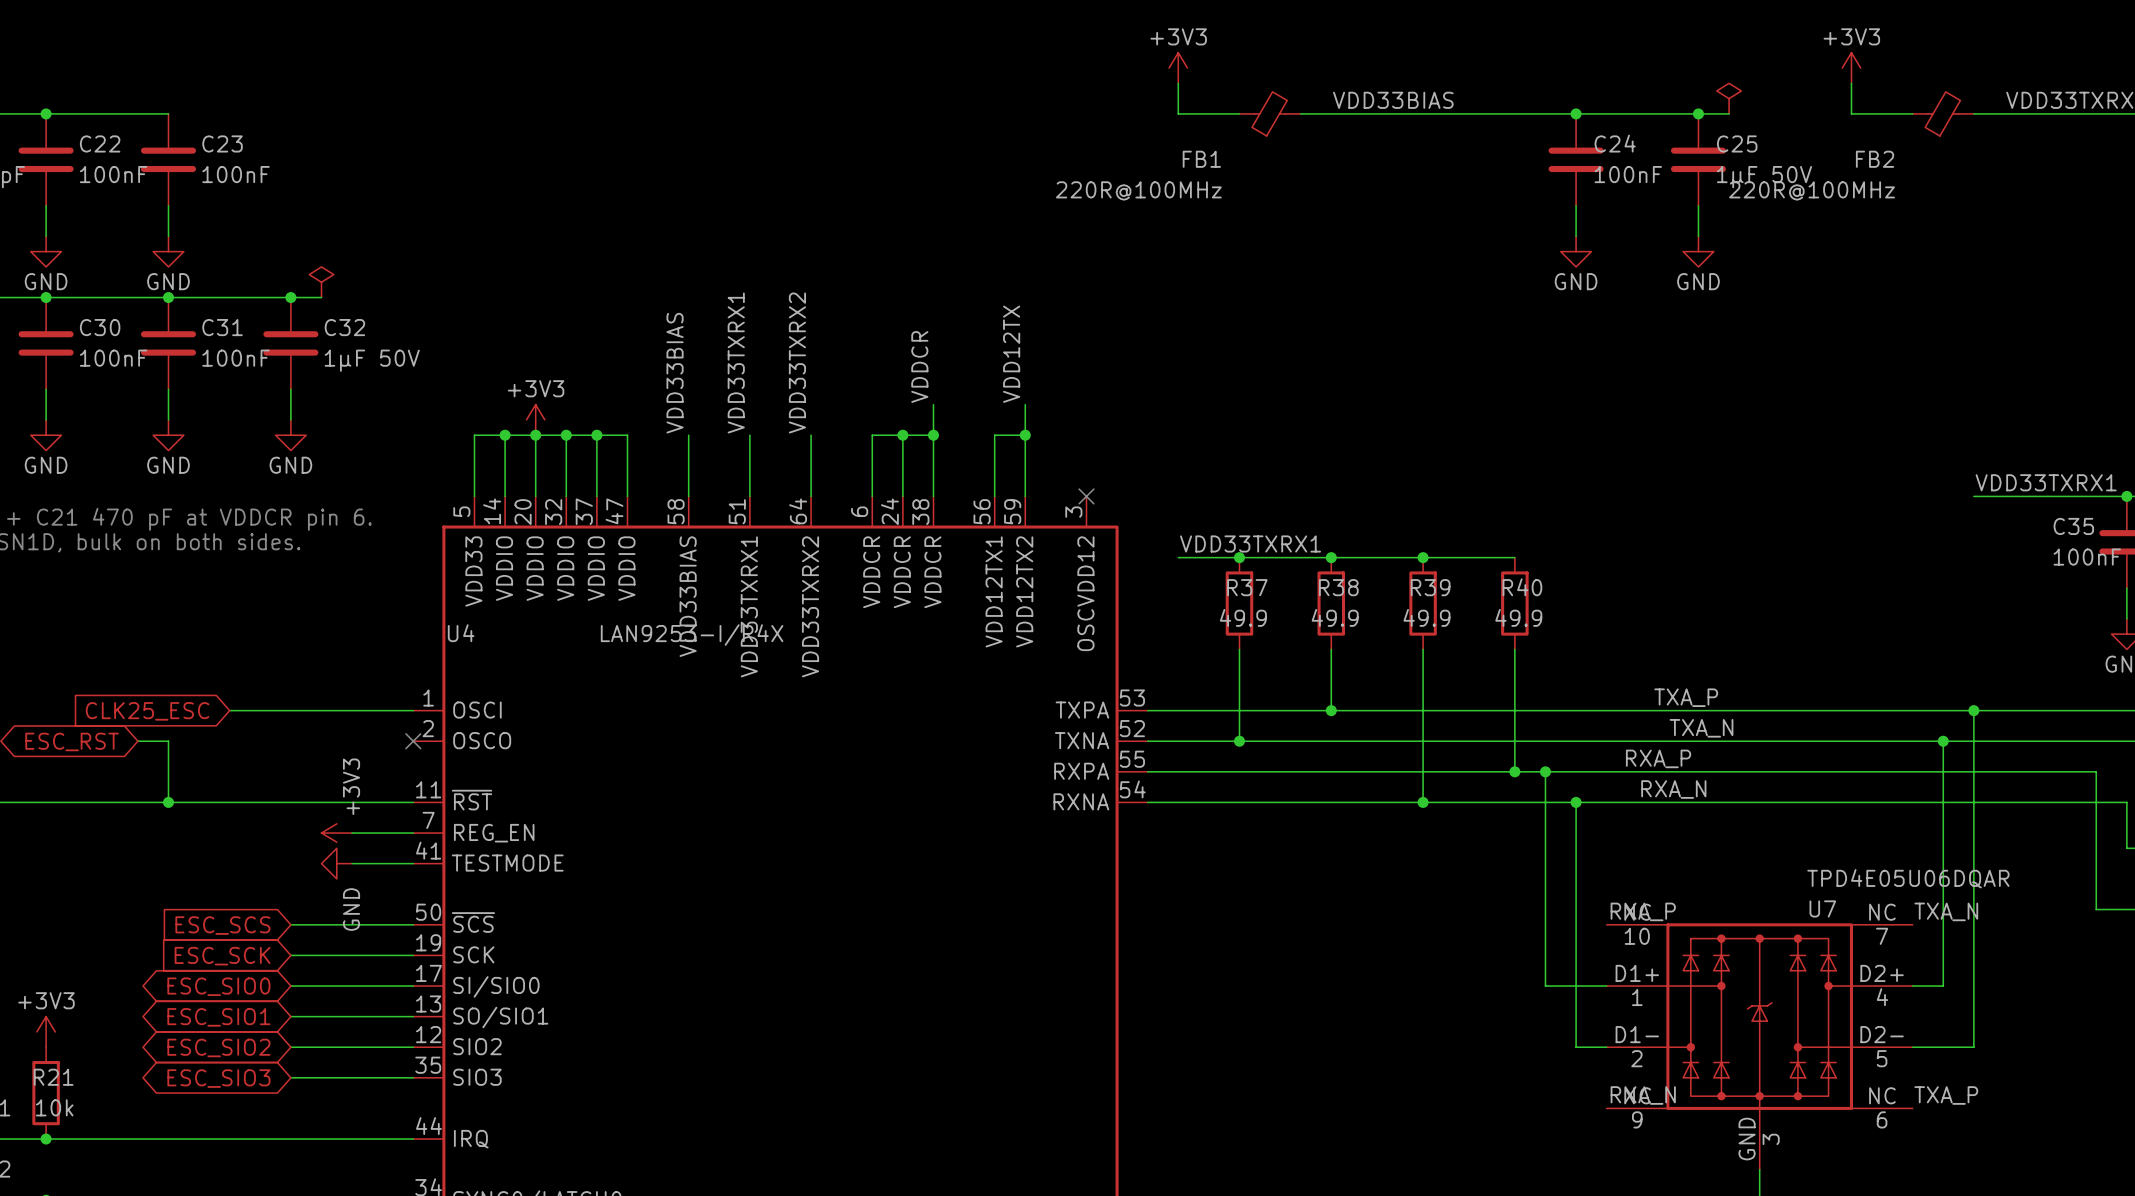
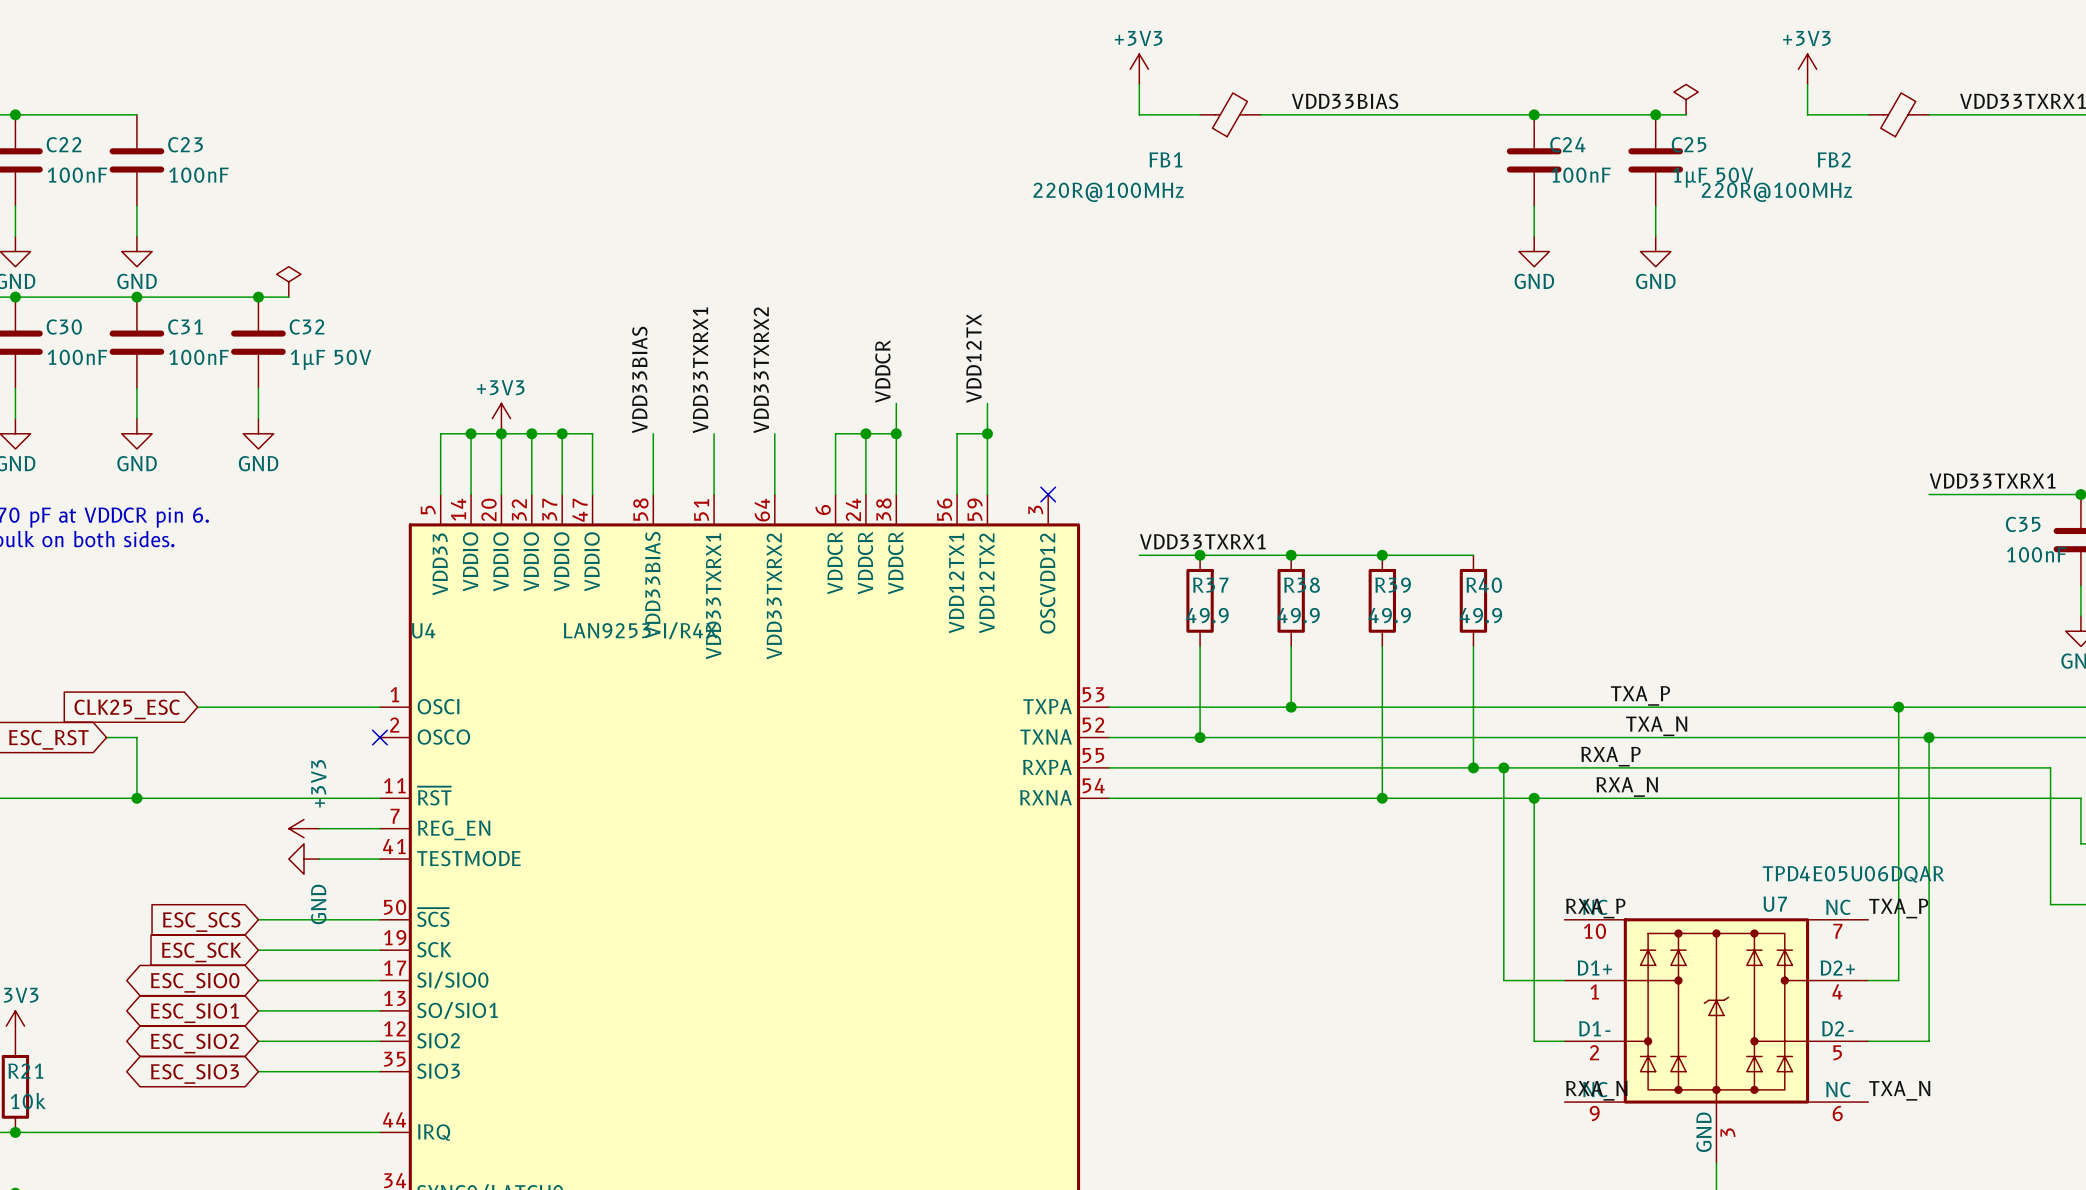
junction: none -> (1898, 707)
wire: (1973, 710) (1973, 741) -> (1898, 707) (1898, 737)
junction: (1973, 710) -> none
junction: (1943, 741) -> none
junction: none -> (1929, 737)
label: TXA_N (1946, 911) -> TXA_P (1898, 908)
label: TXA_P (1946, 1095) -> TXA_N (1899, 1090)

